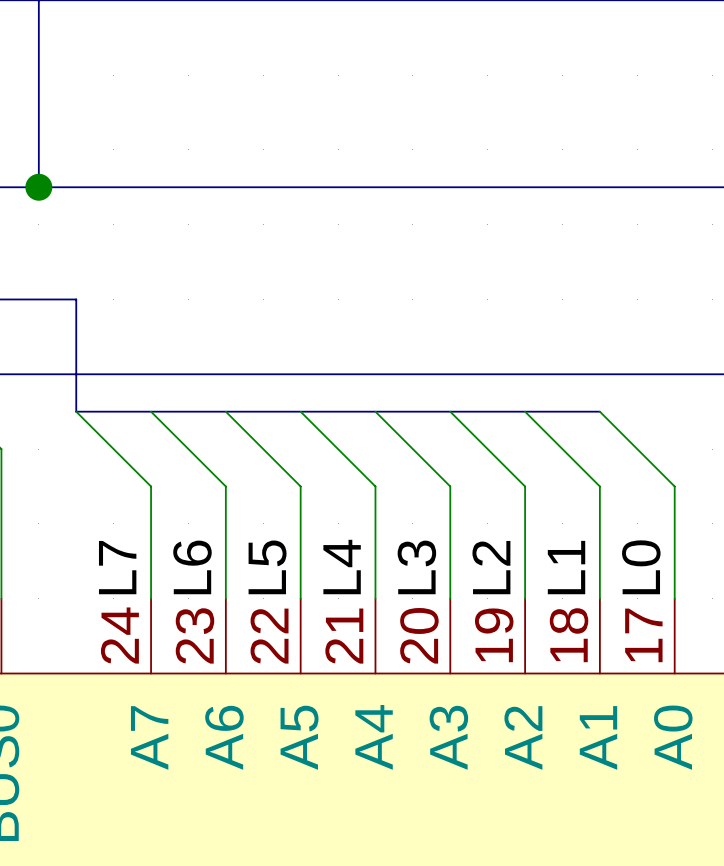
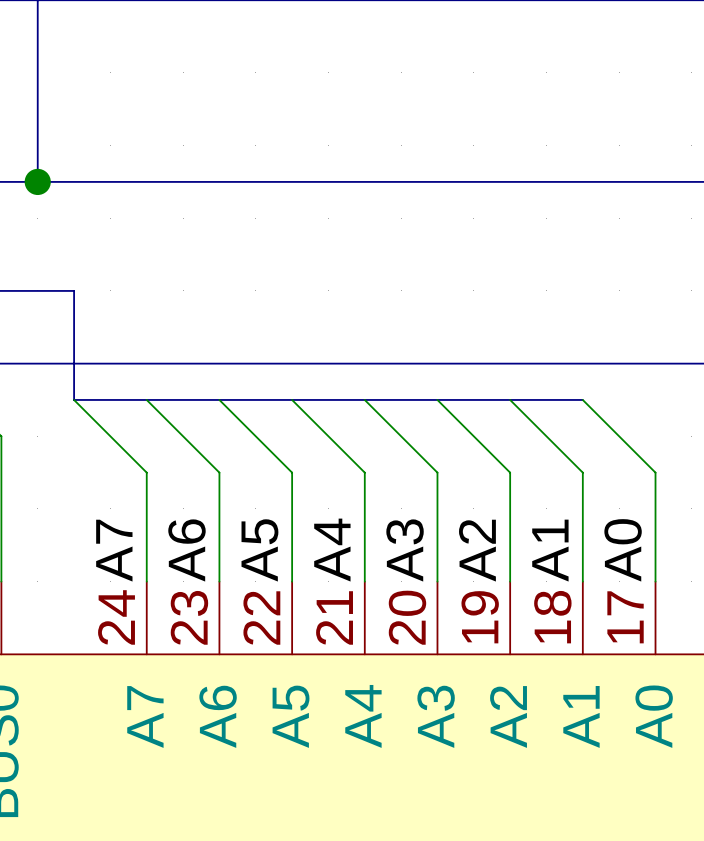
label: L7 (117, 567) -> A7 (114, 550)
label: L6 (192, 567) -> A6 (186, 550)
label: L5 (267, 567) -> A5 (259, 550)
label: L4 (342, 567) -> A4 (332, 550)
label: L3 (416, 567) -> A3 (405, 550)
label: L2 (491, 567) -> A2 (477, 550)
label: L1 (566, 567) -> A1 (550, 550)
label: L0 (641, 567) -> A0 (623, 550)

